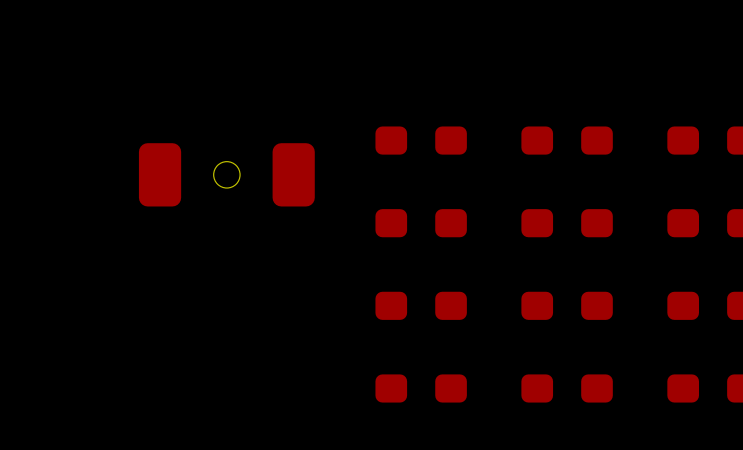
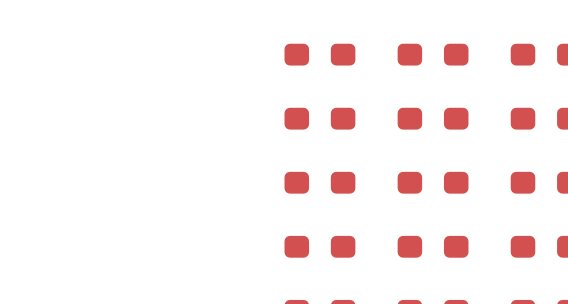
part: (226, 174) -> none

